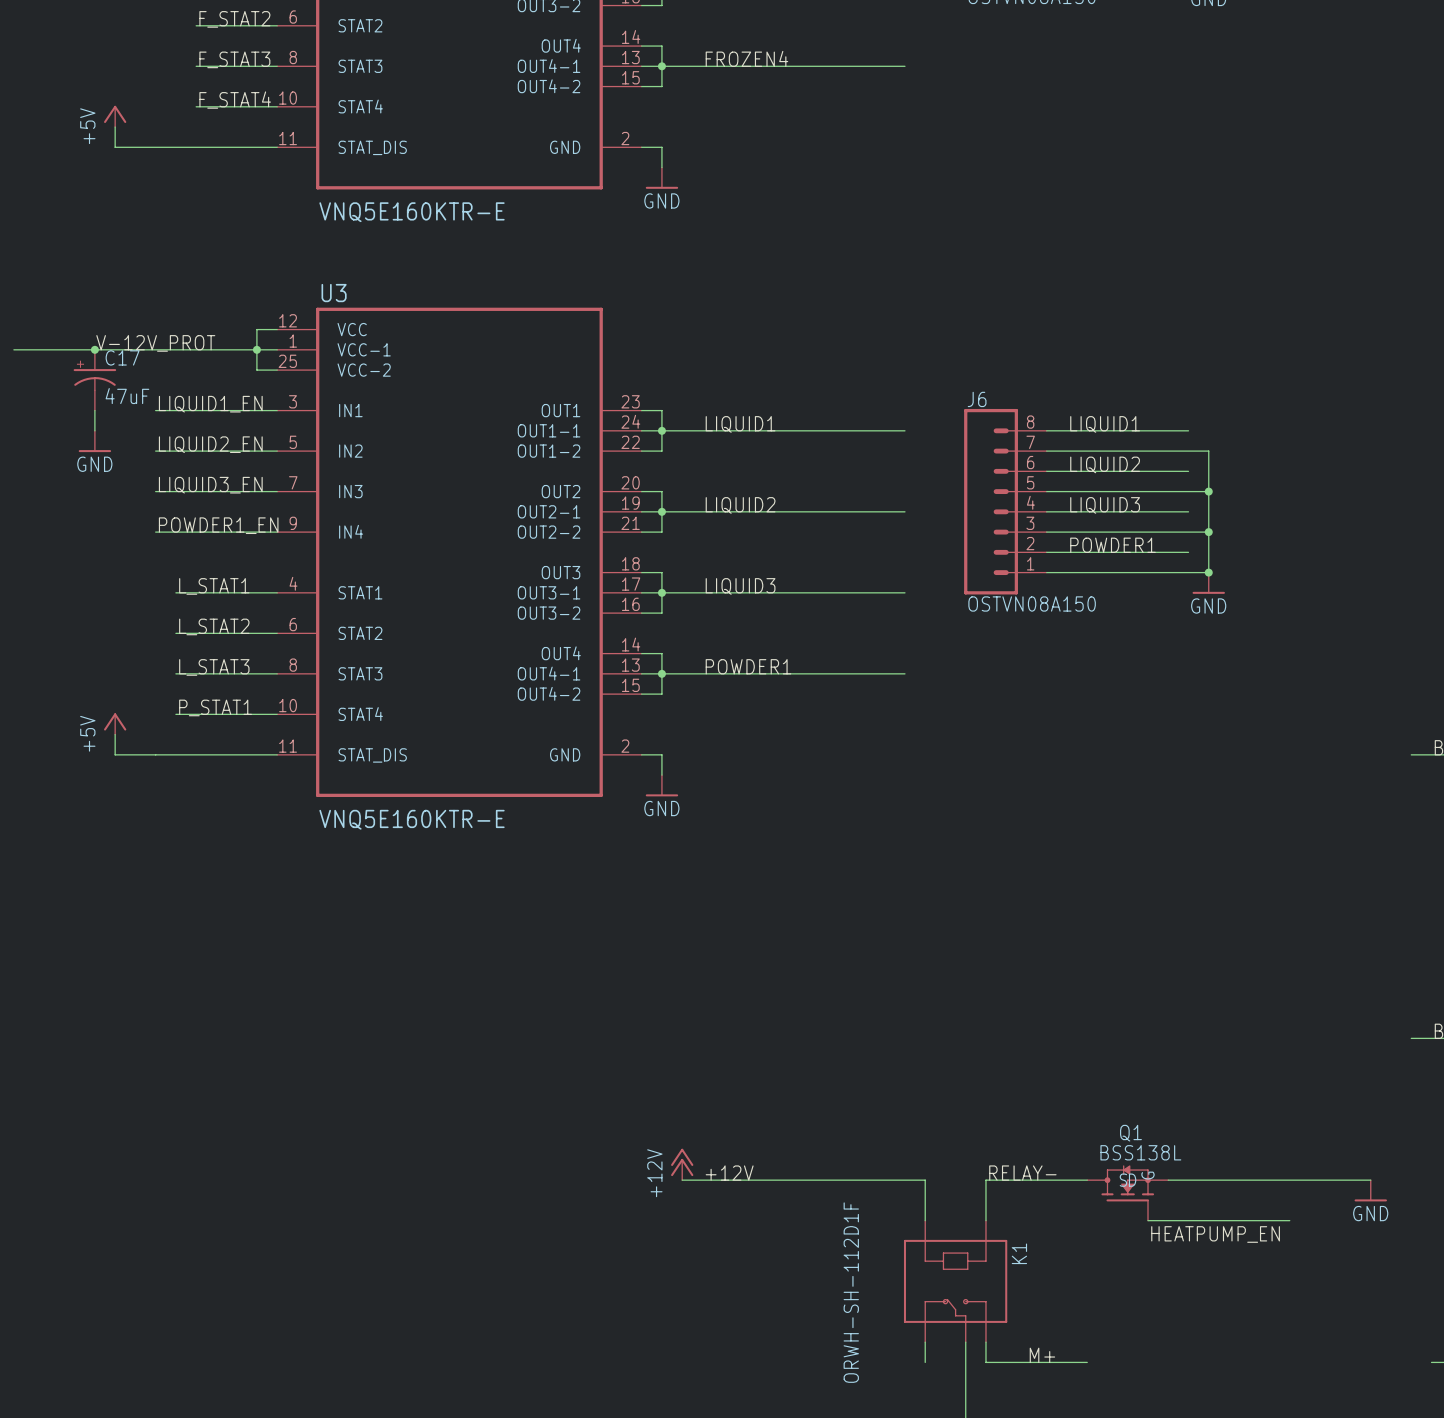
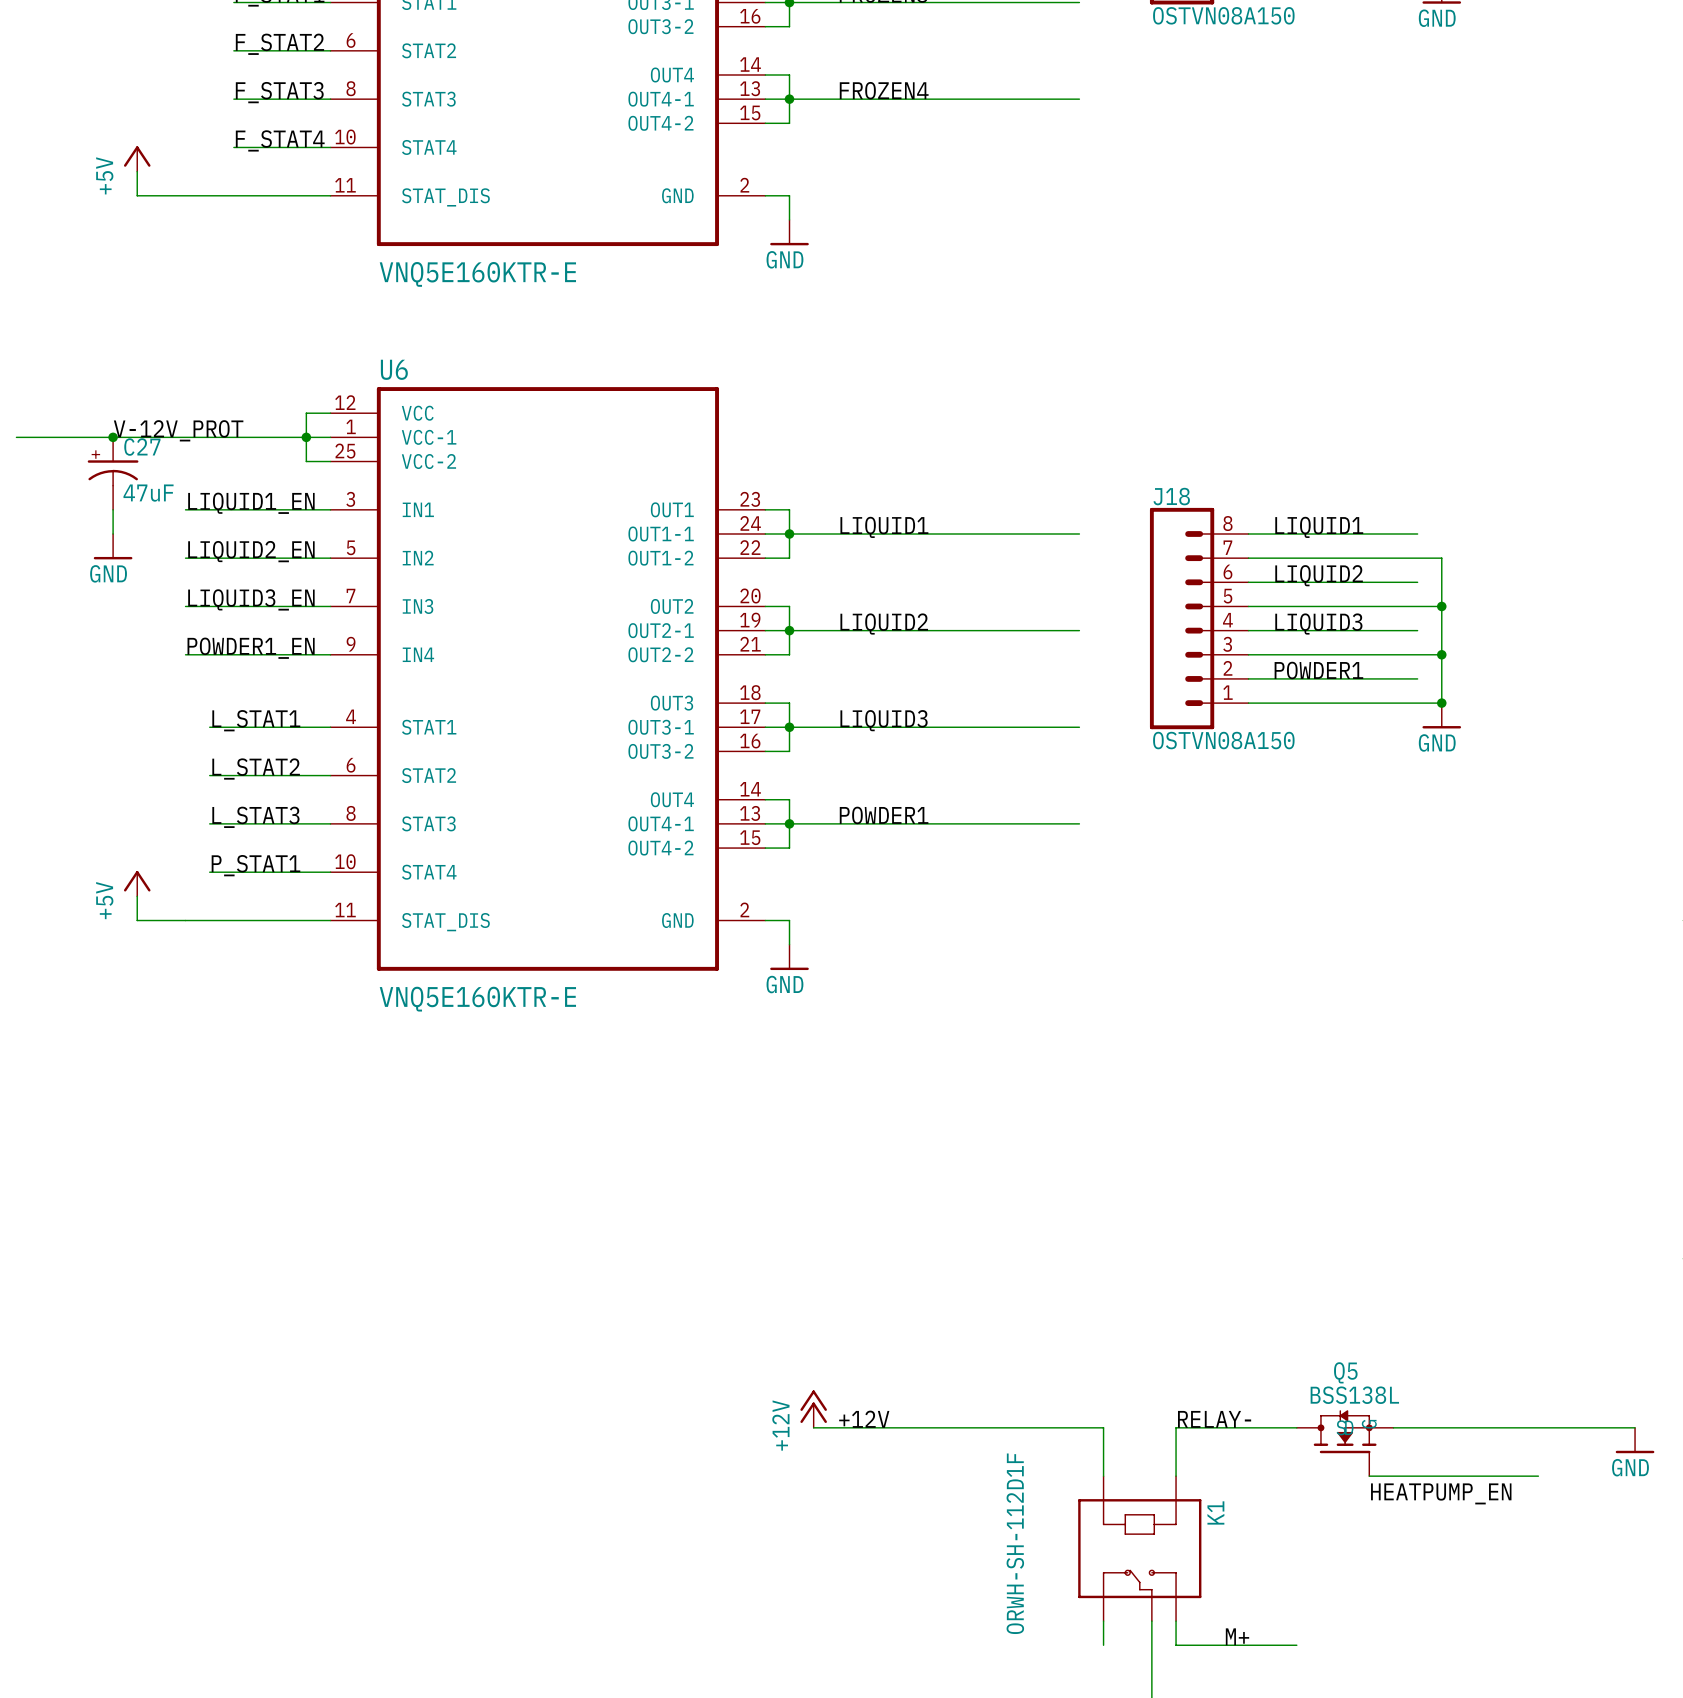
U3 name: U3 (334, 293) -> U6 (394, 369)
C17 name: C17 (122, 357) -> C27 (142, 447)
J6 name: J6 (977, 399) -> J18 (1171, 496)
Q1 name: Q1 (1130, 1133) -> Q5 (1345, 1372)

